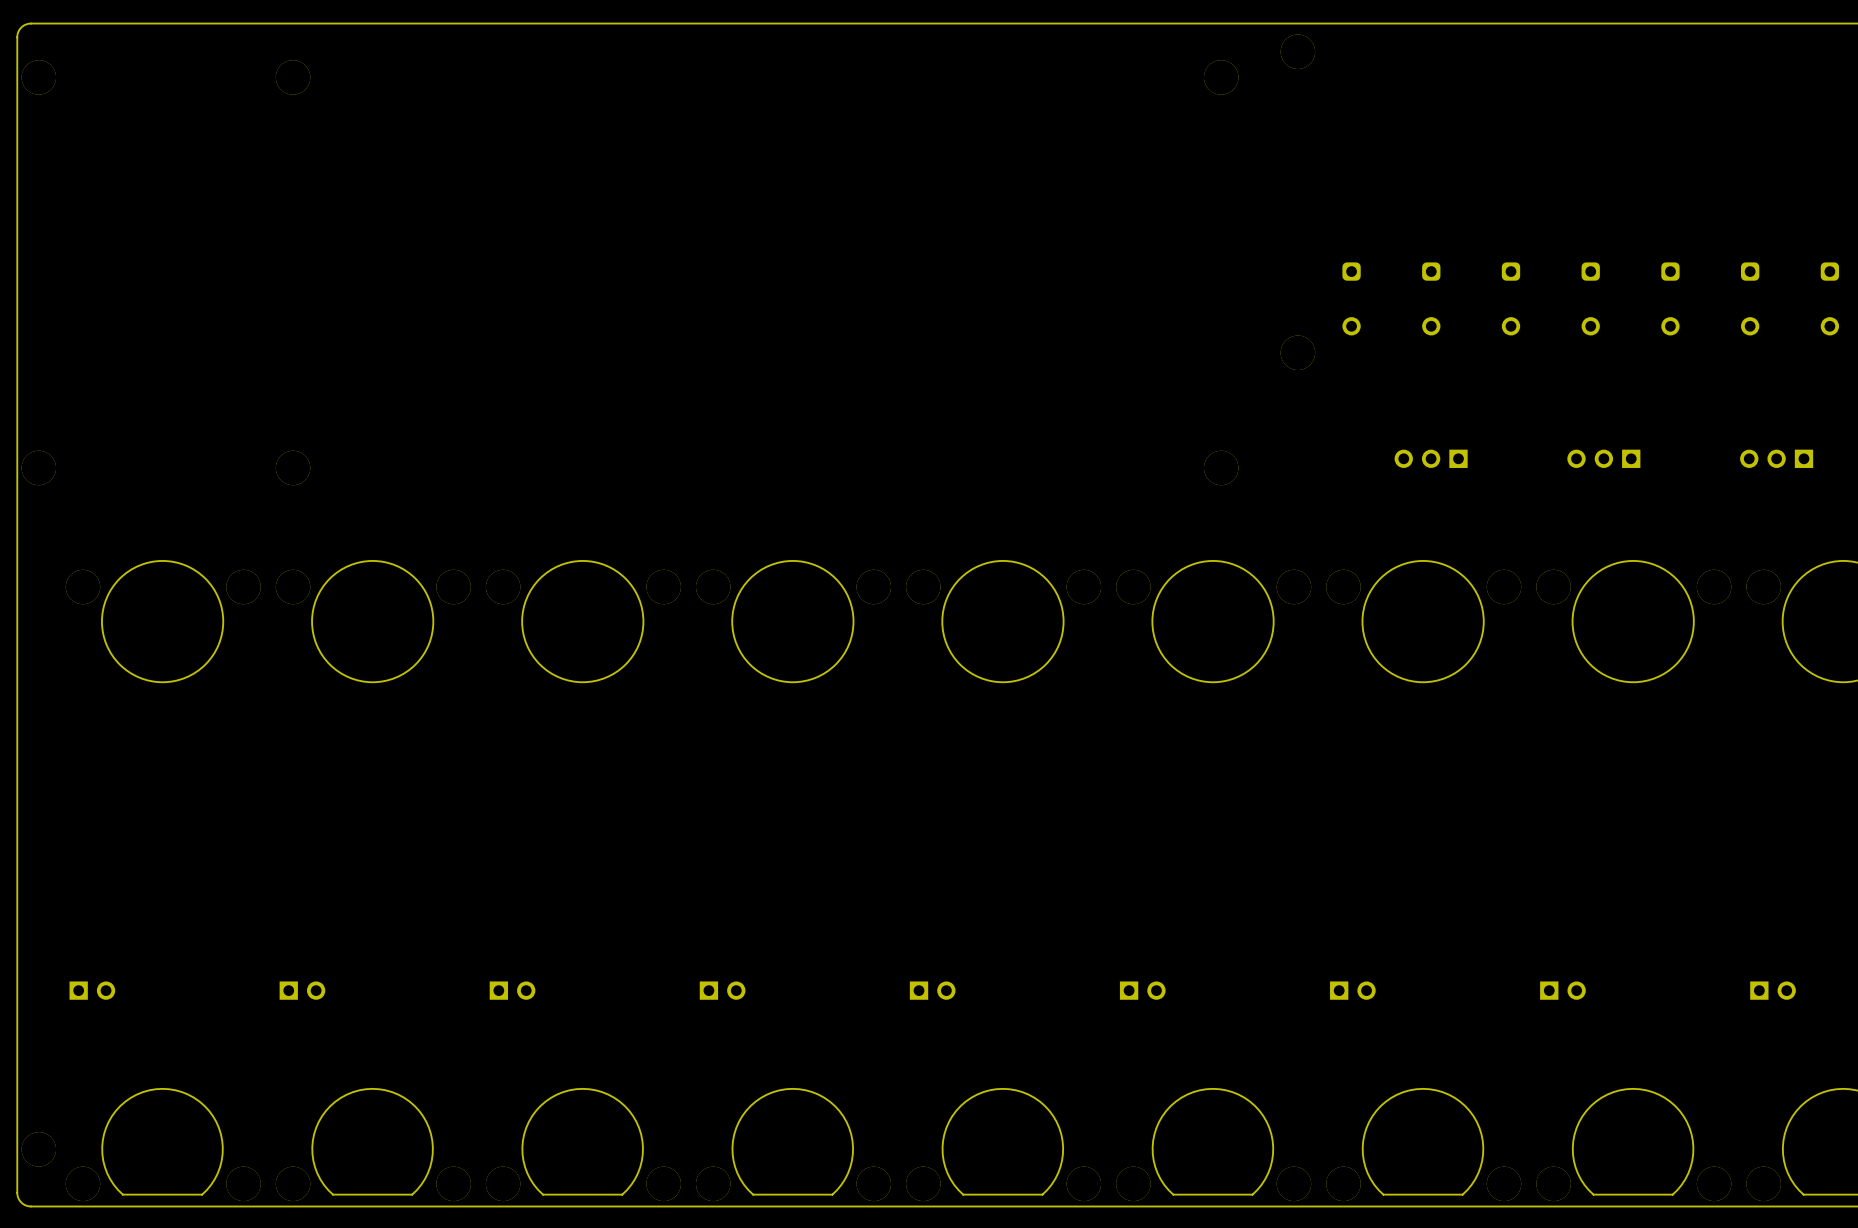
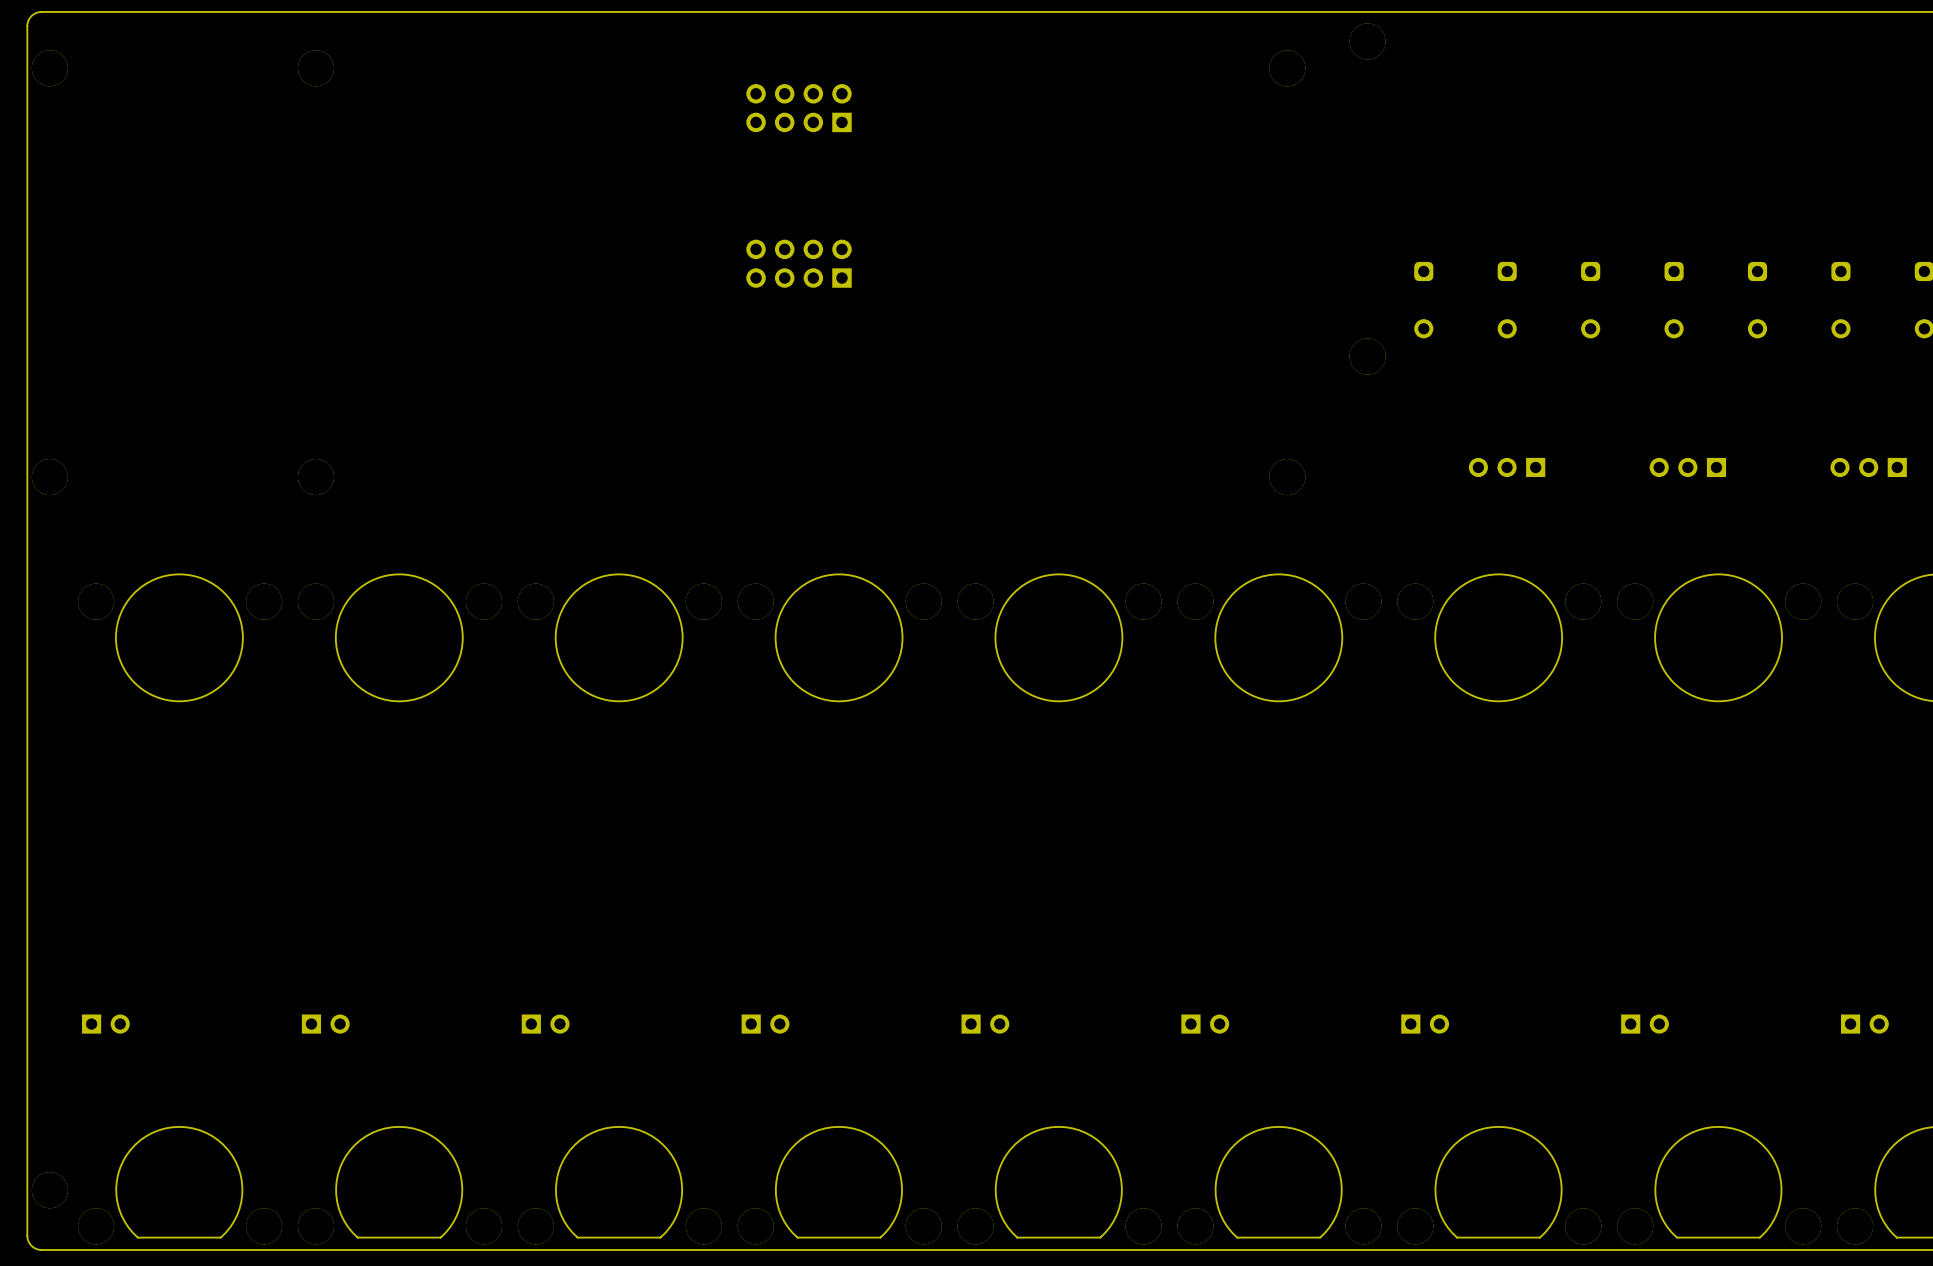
part: none -> (799, 108)
part: none -> (799, 263)

